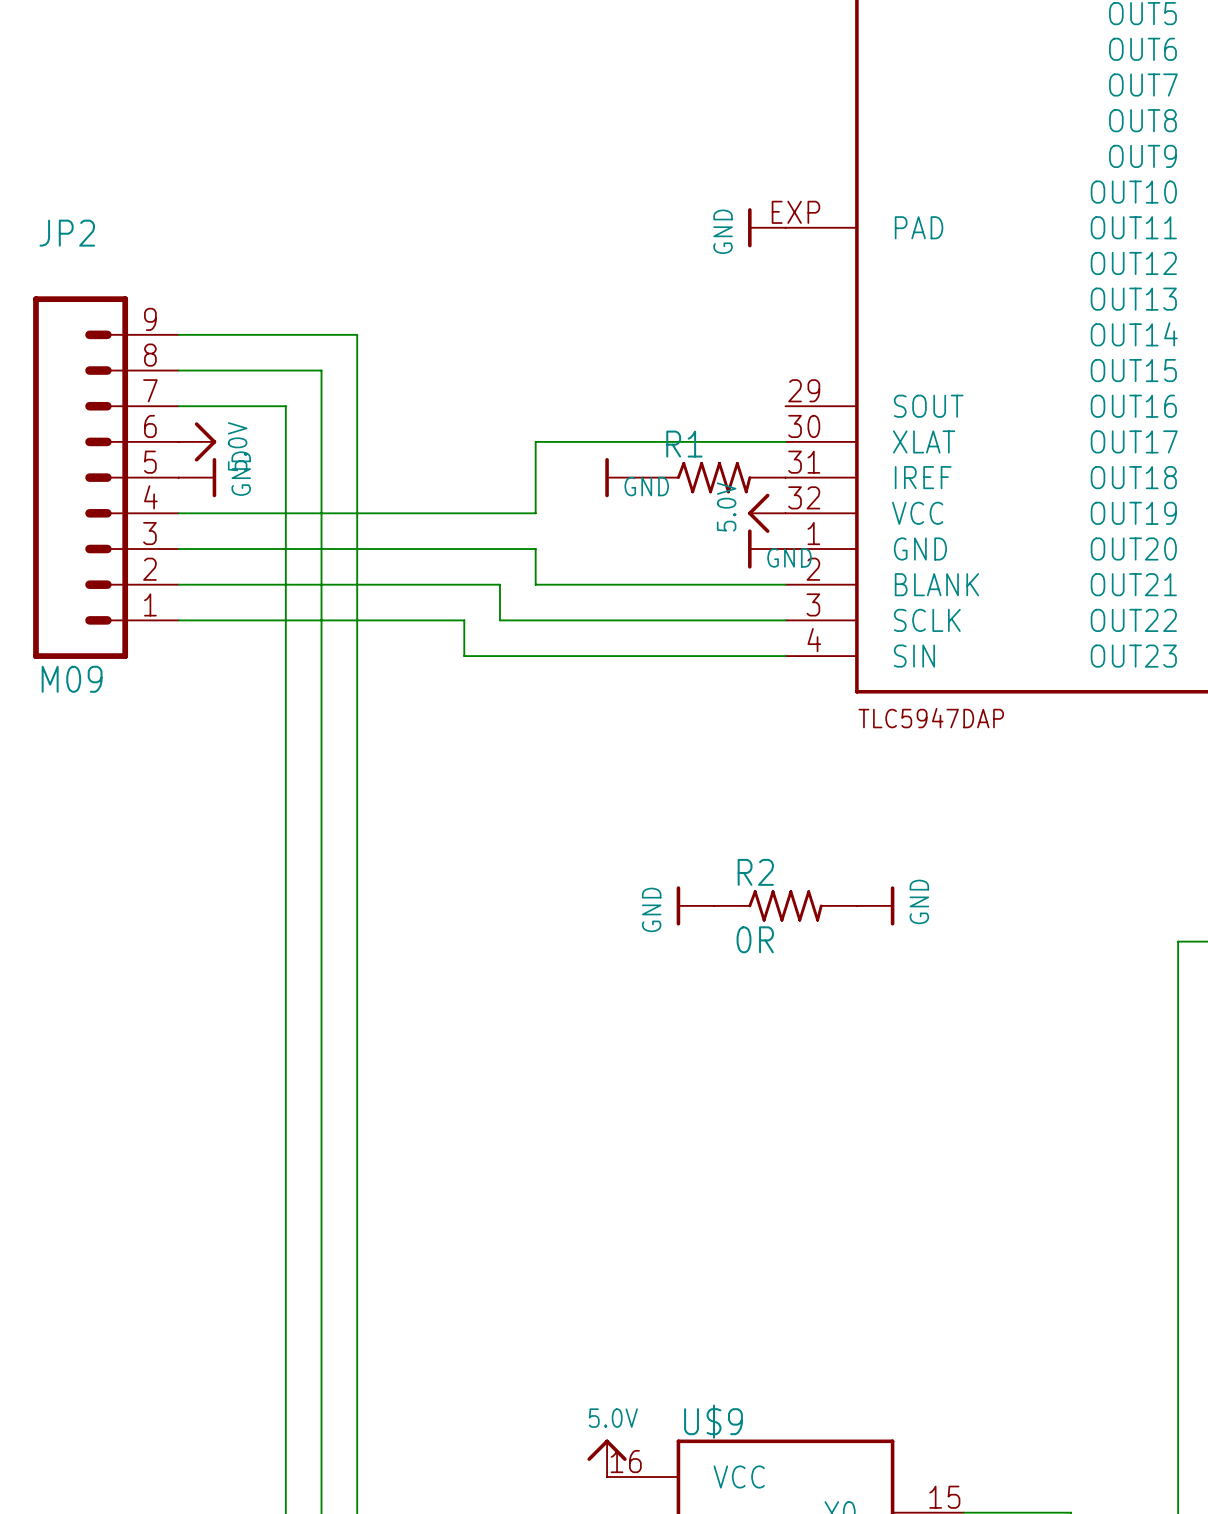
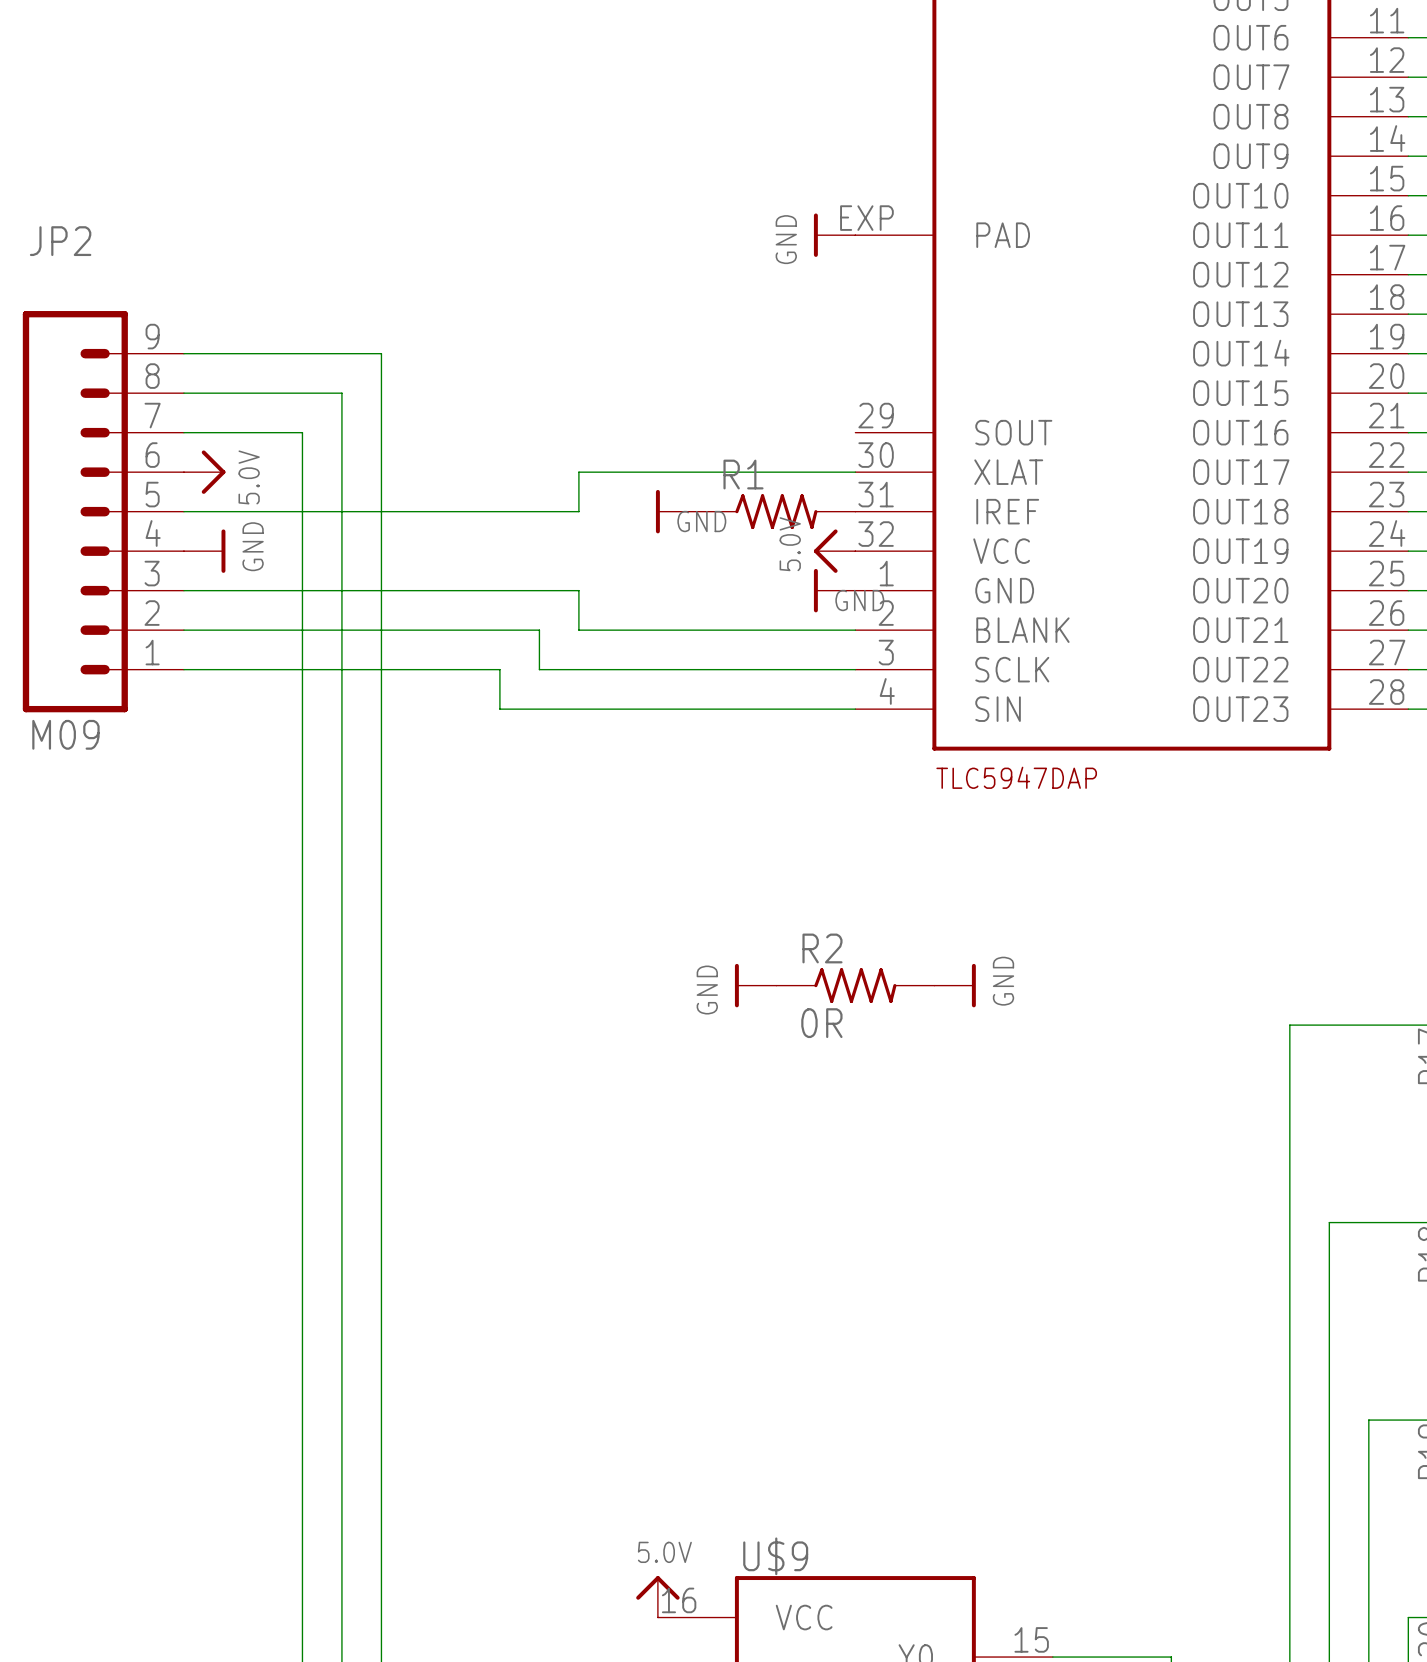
power symbol position: GND (197, 477) -> GND (204, 551)
wire: (535, 477) (535, 513) (178, 513) -> (578, 511) (183, 511)

